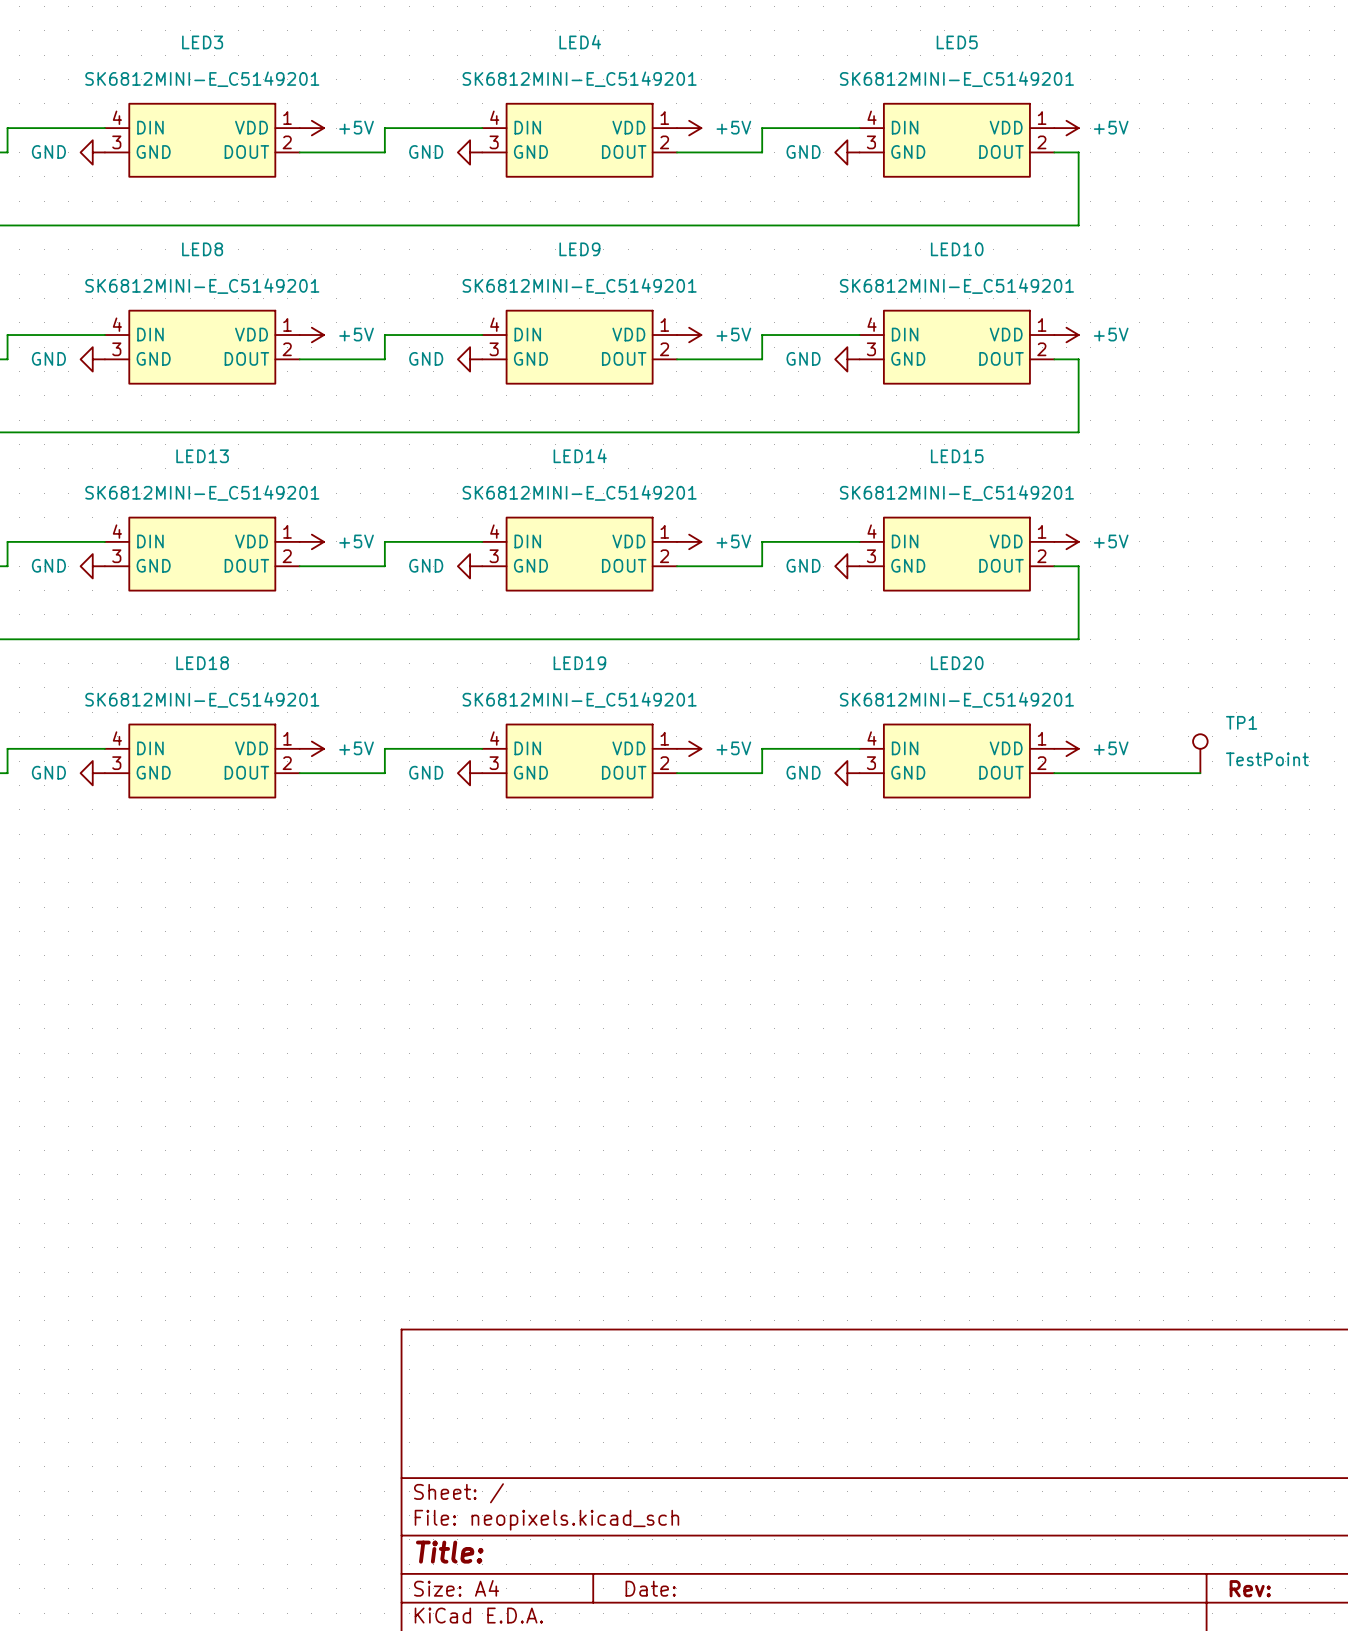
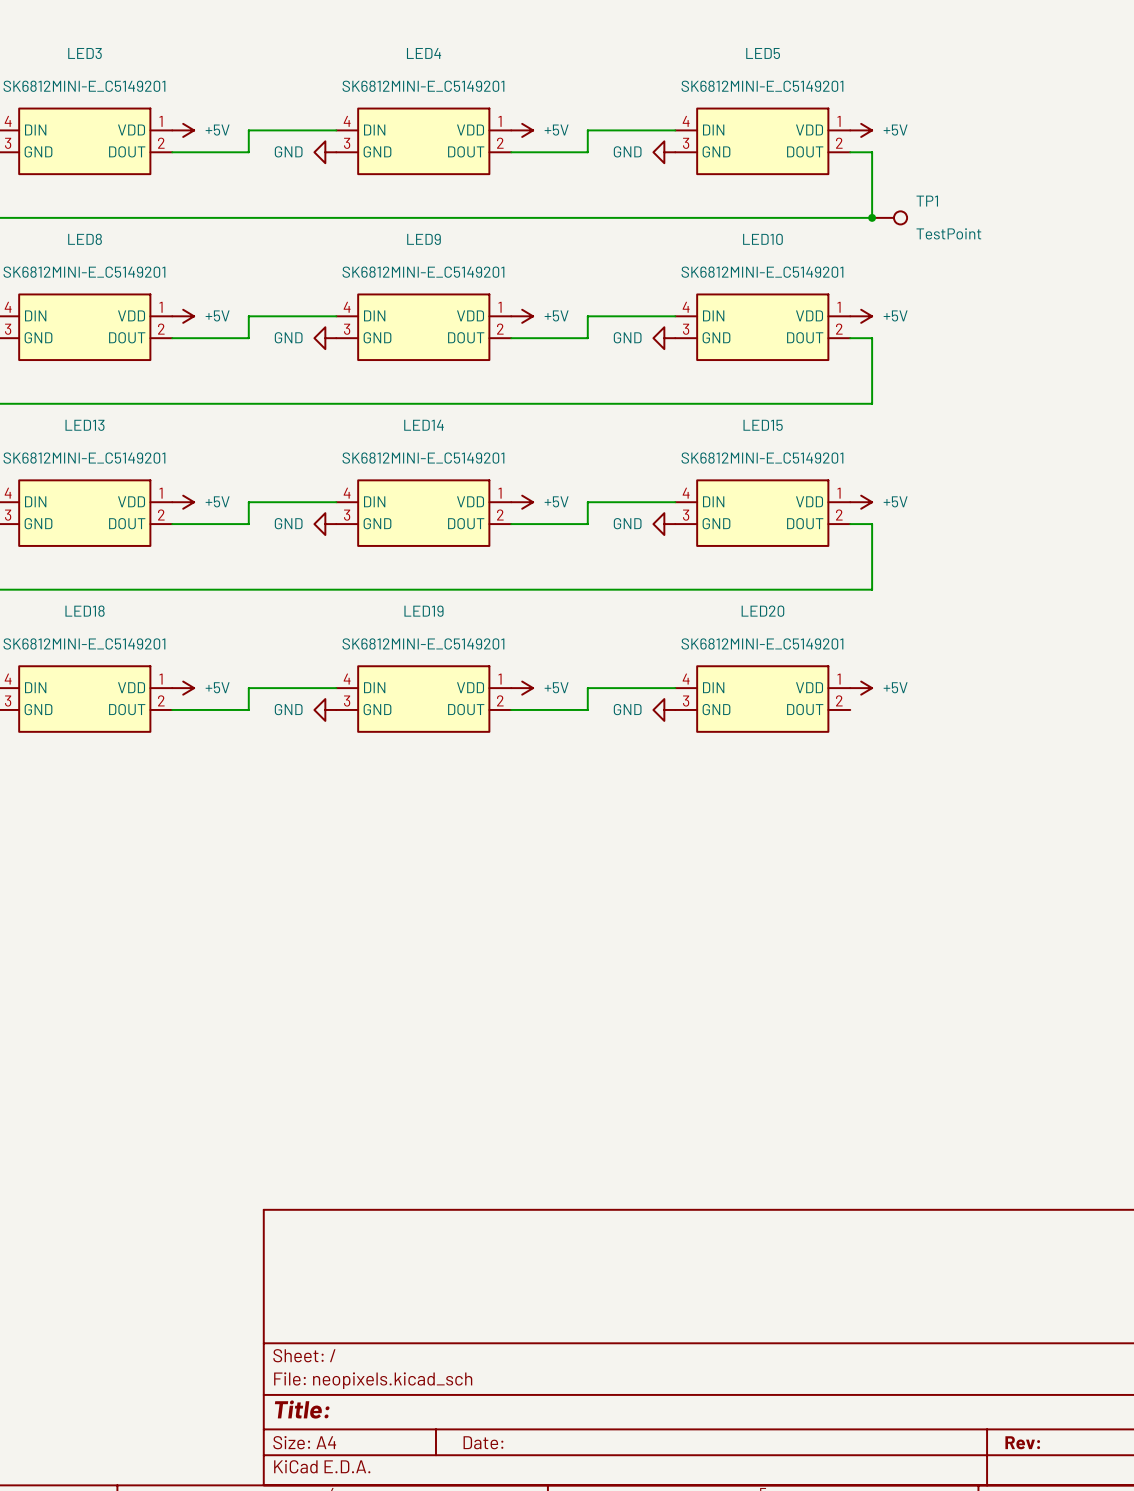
junction: none -> (872, 217)
TP1 rotation: 0° (1200, 741) -> 90° clockwise (900, 217)
TP1 position: (1200, 753) -> (889, 217)
wire: (1054, 773) (1200, 773) -> none

